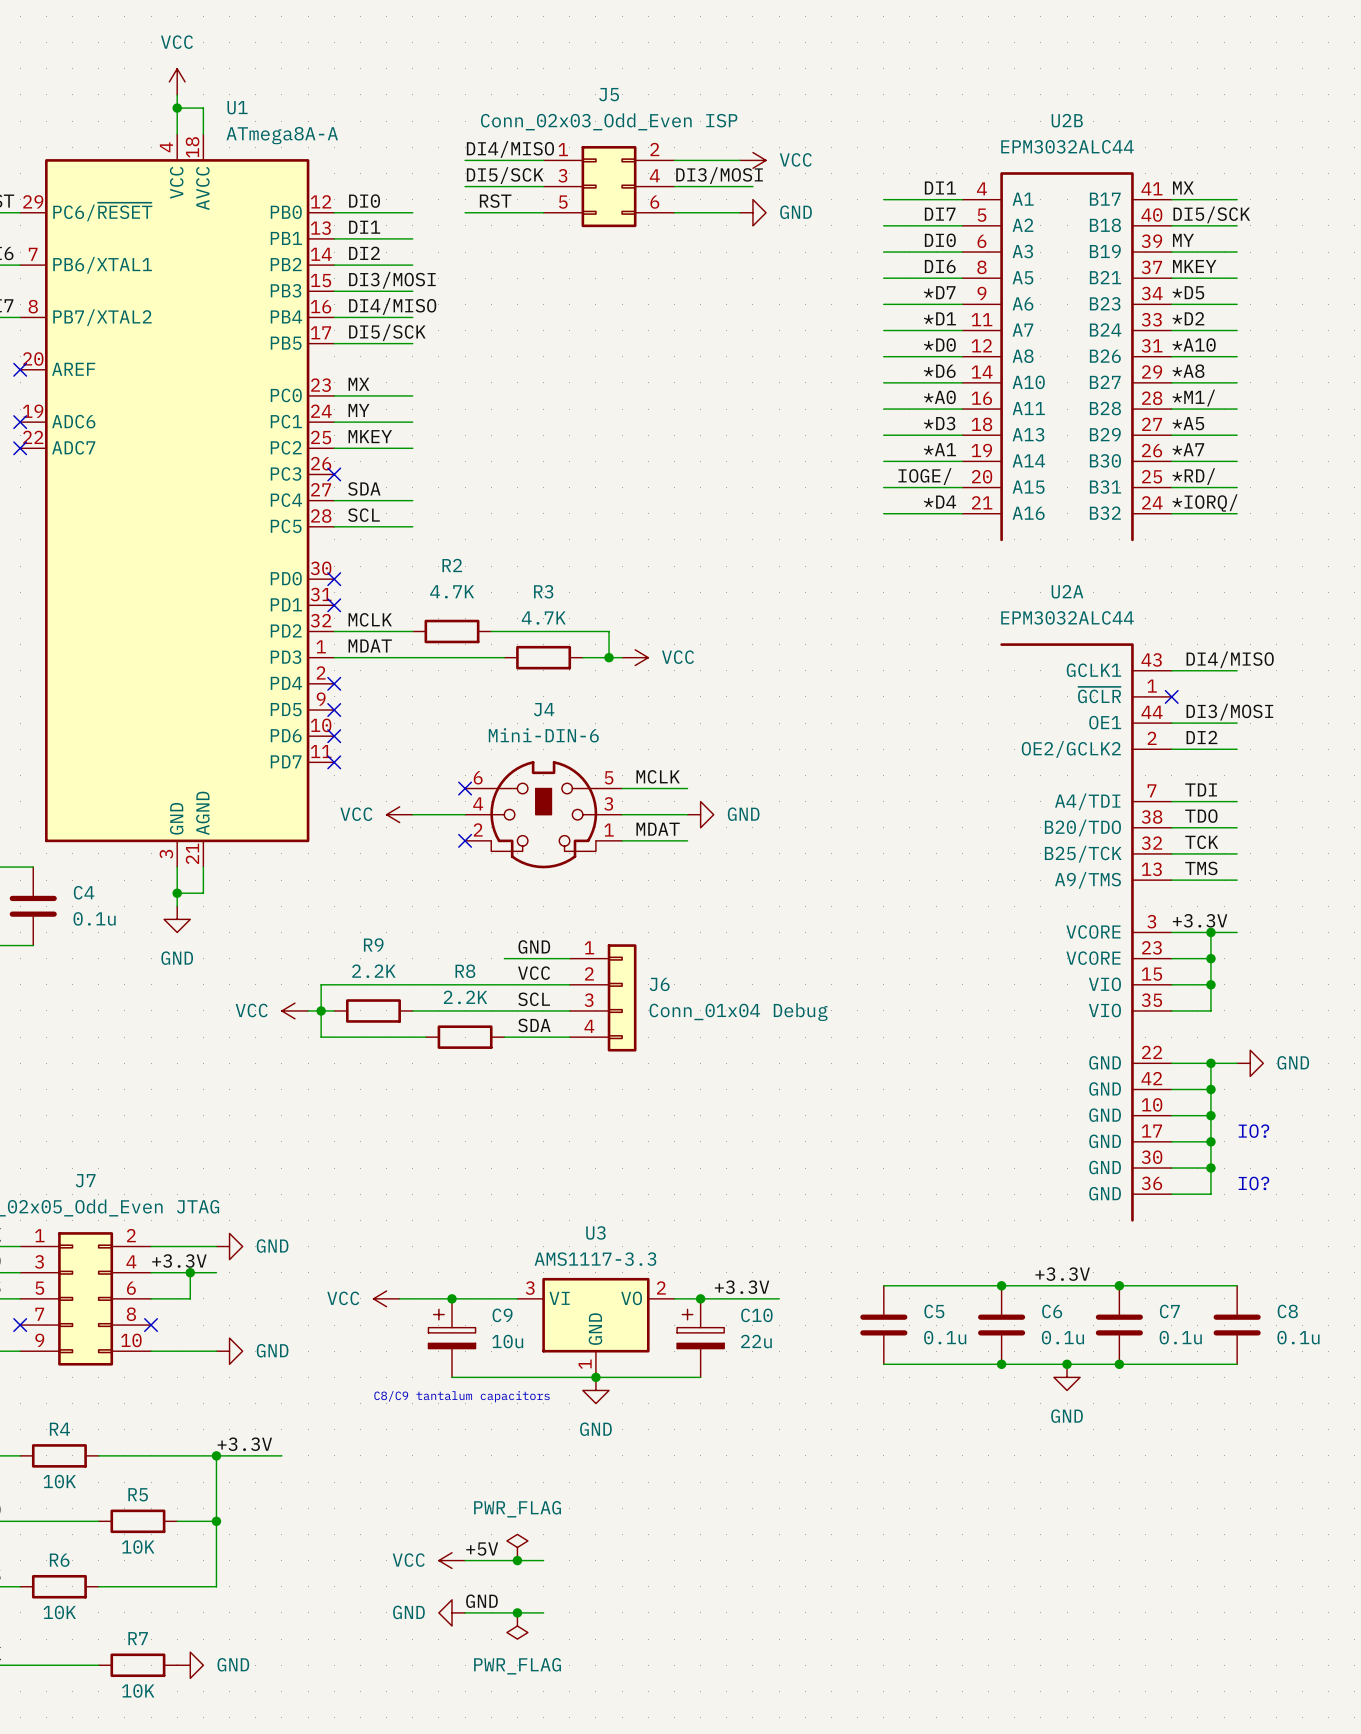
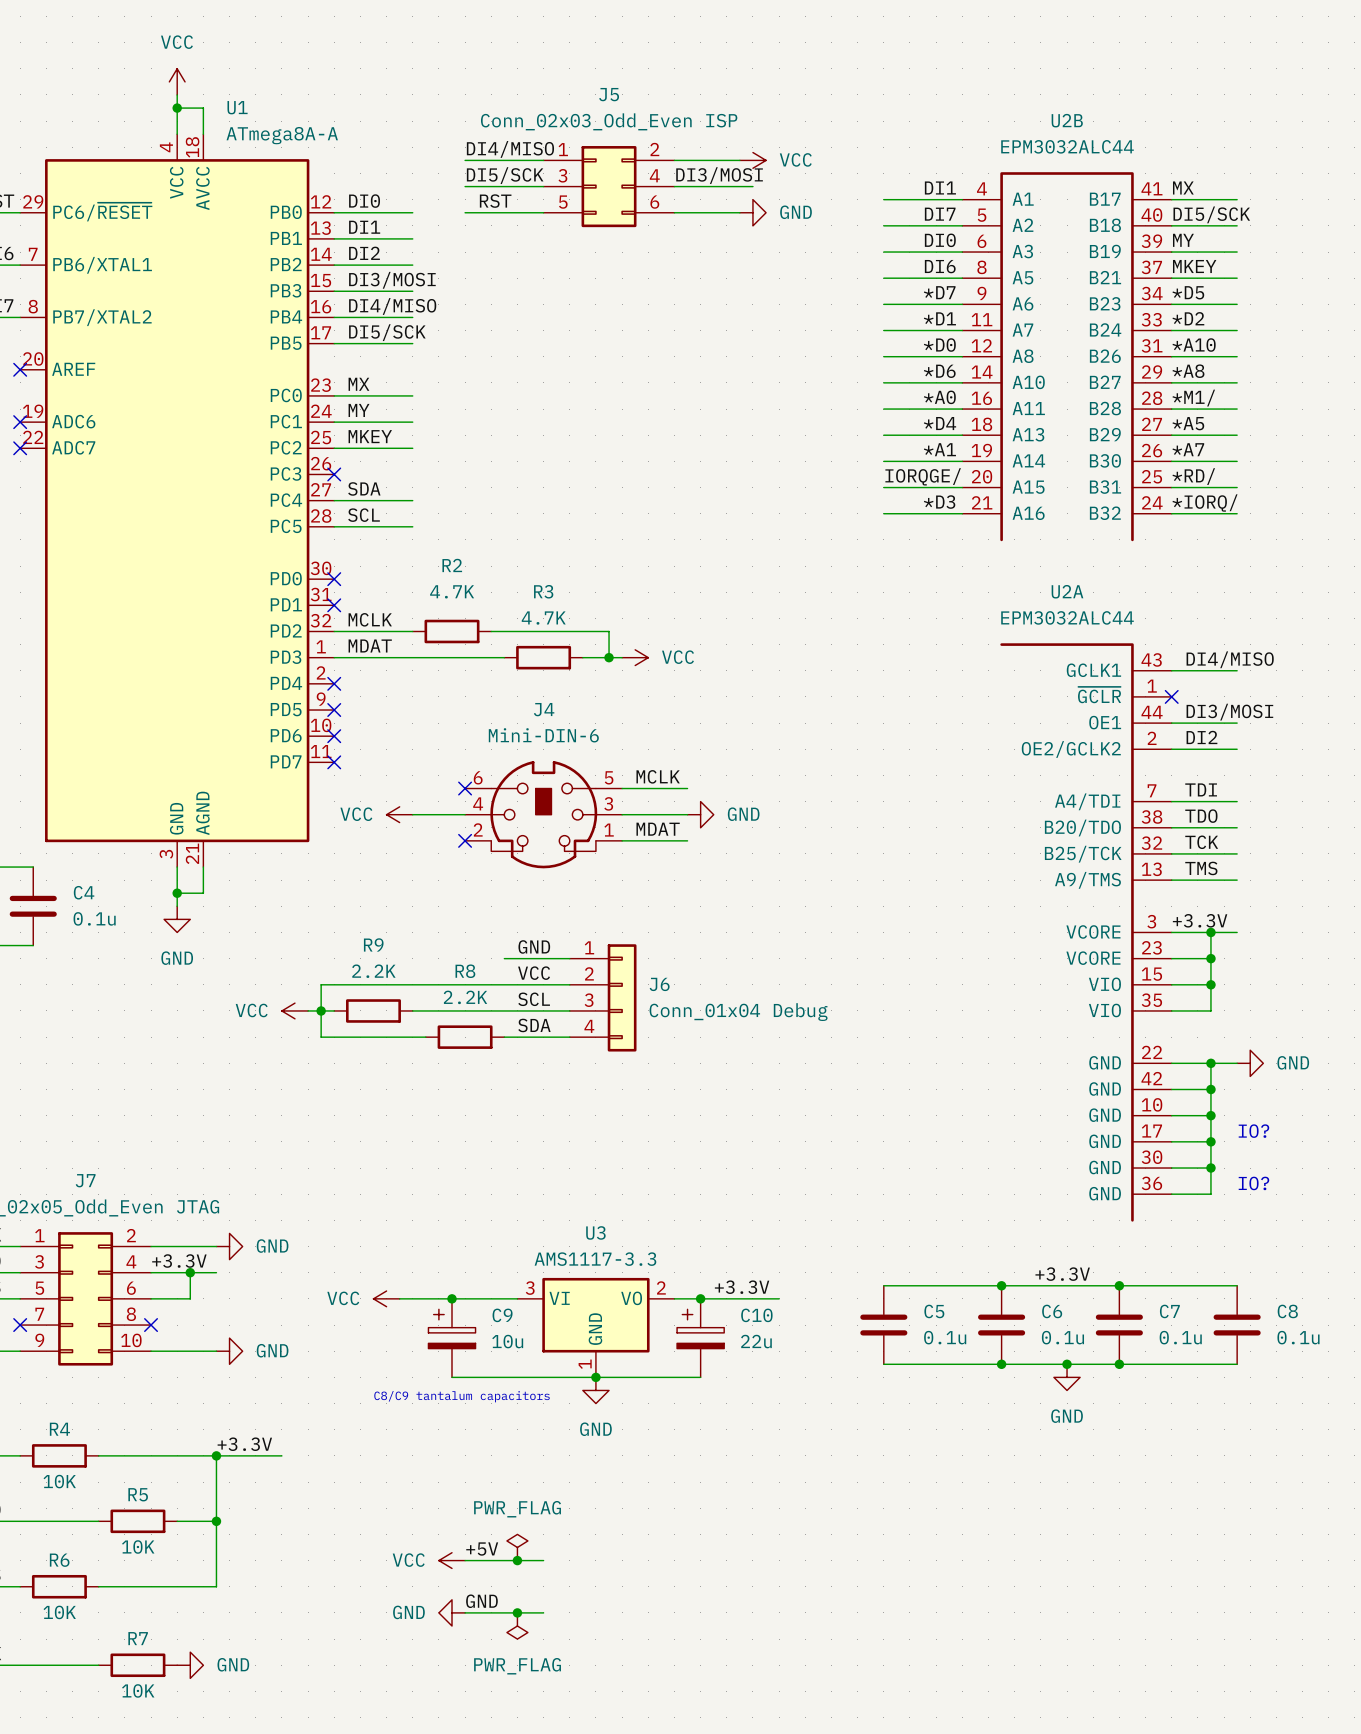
label: *D3 (939, 423) -> *D4 (940, 423)
label: IOGE/ (924, 476) -> IORQGE/ (923, 476)
label: *D4 (940, 502) -> *D3 (939, 502)

